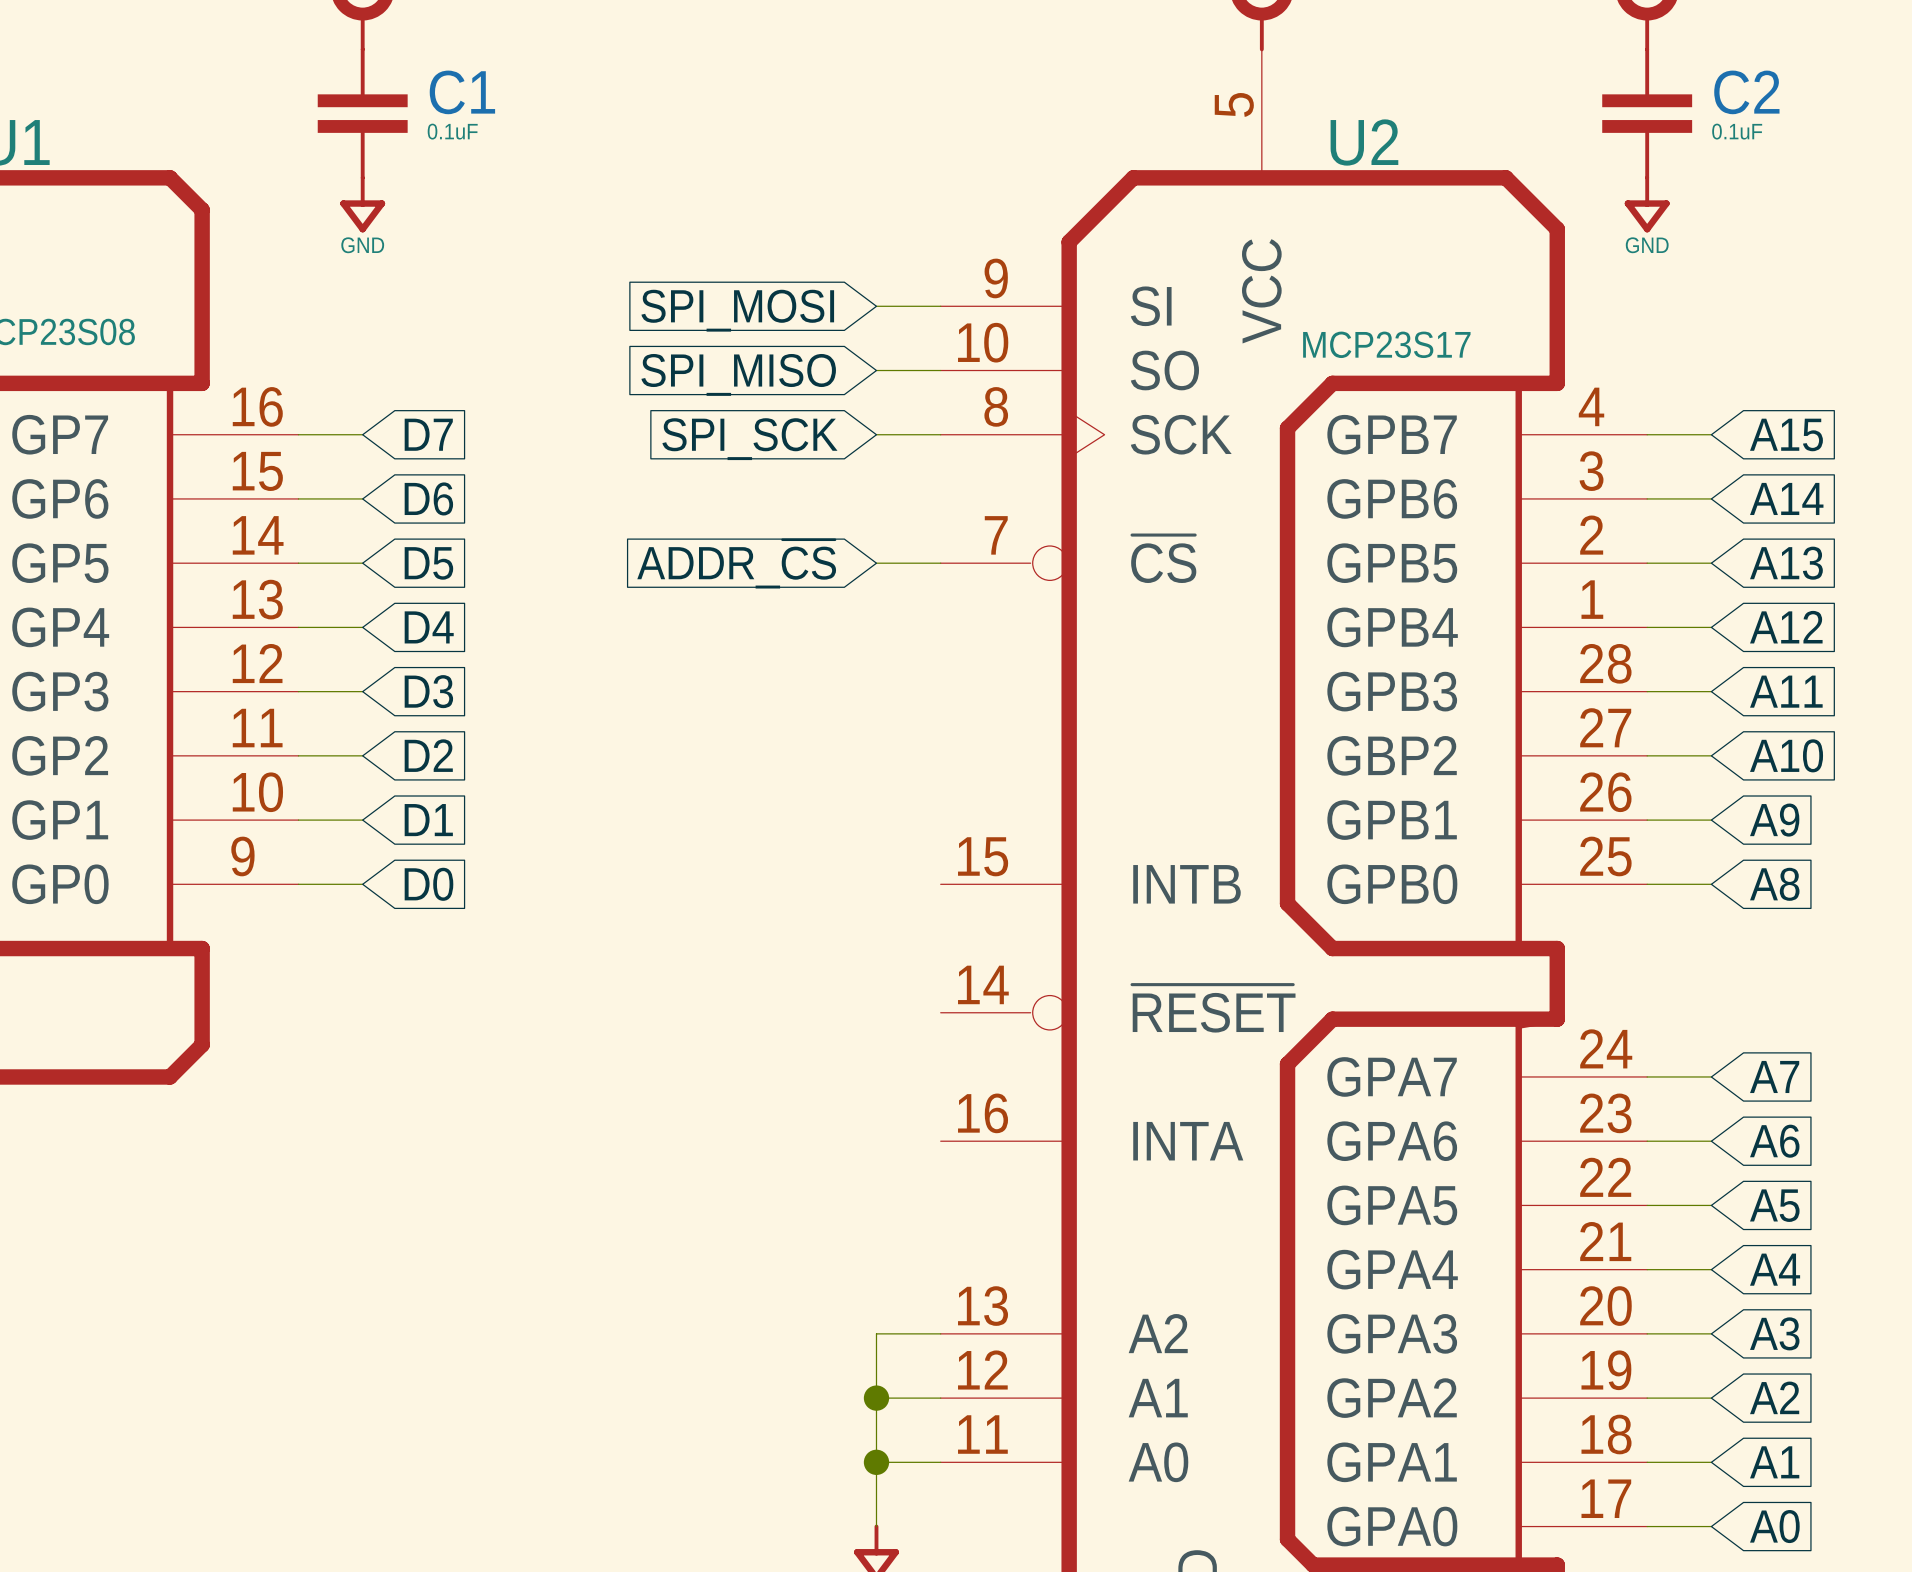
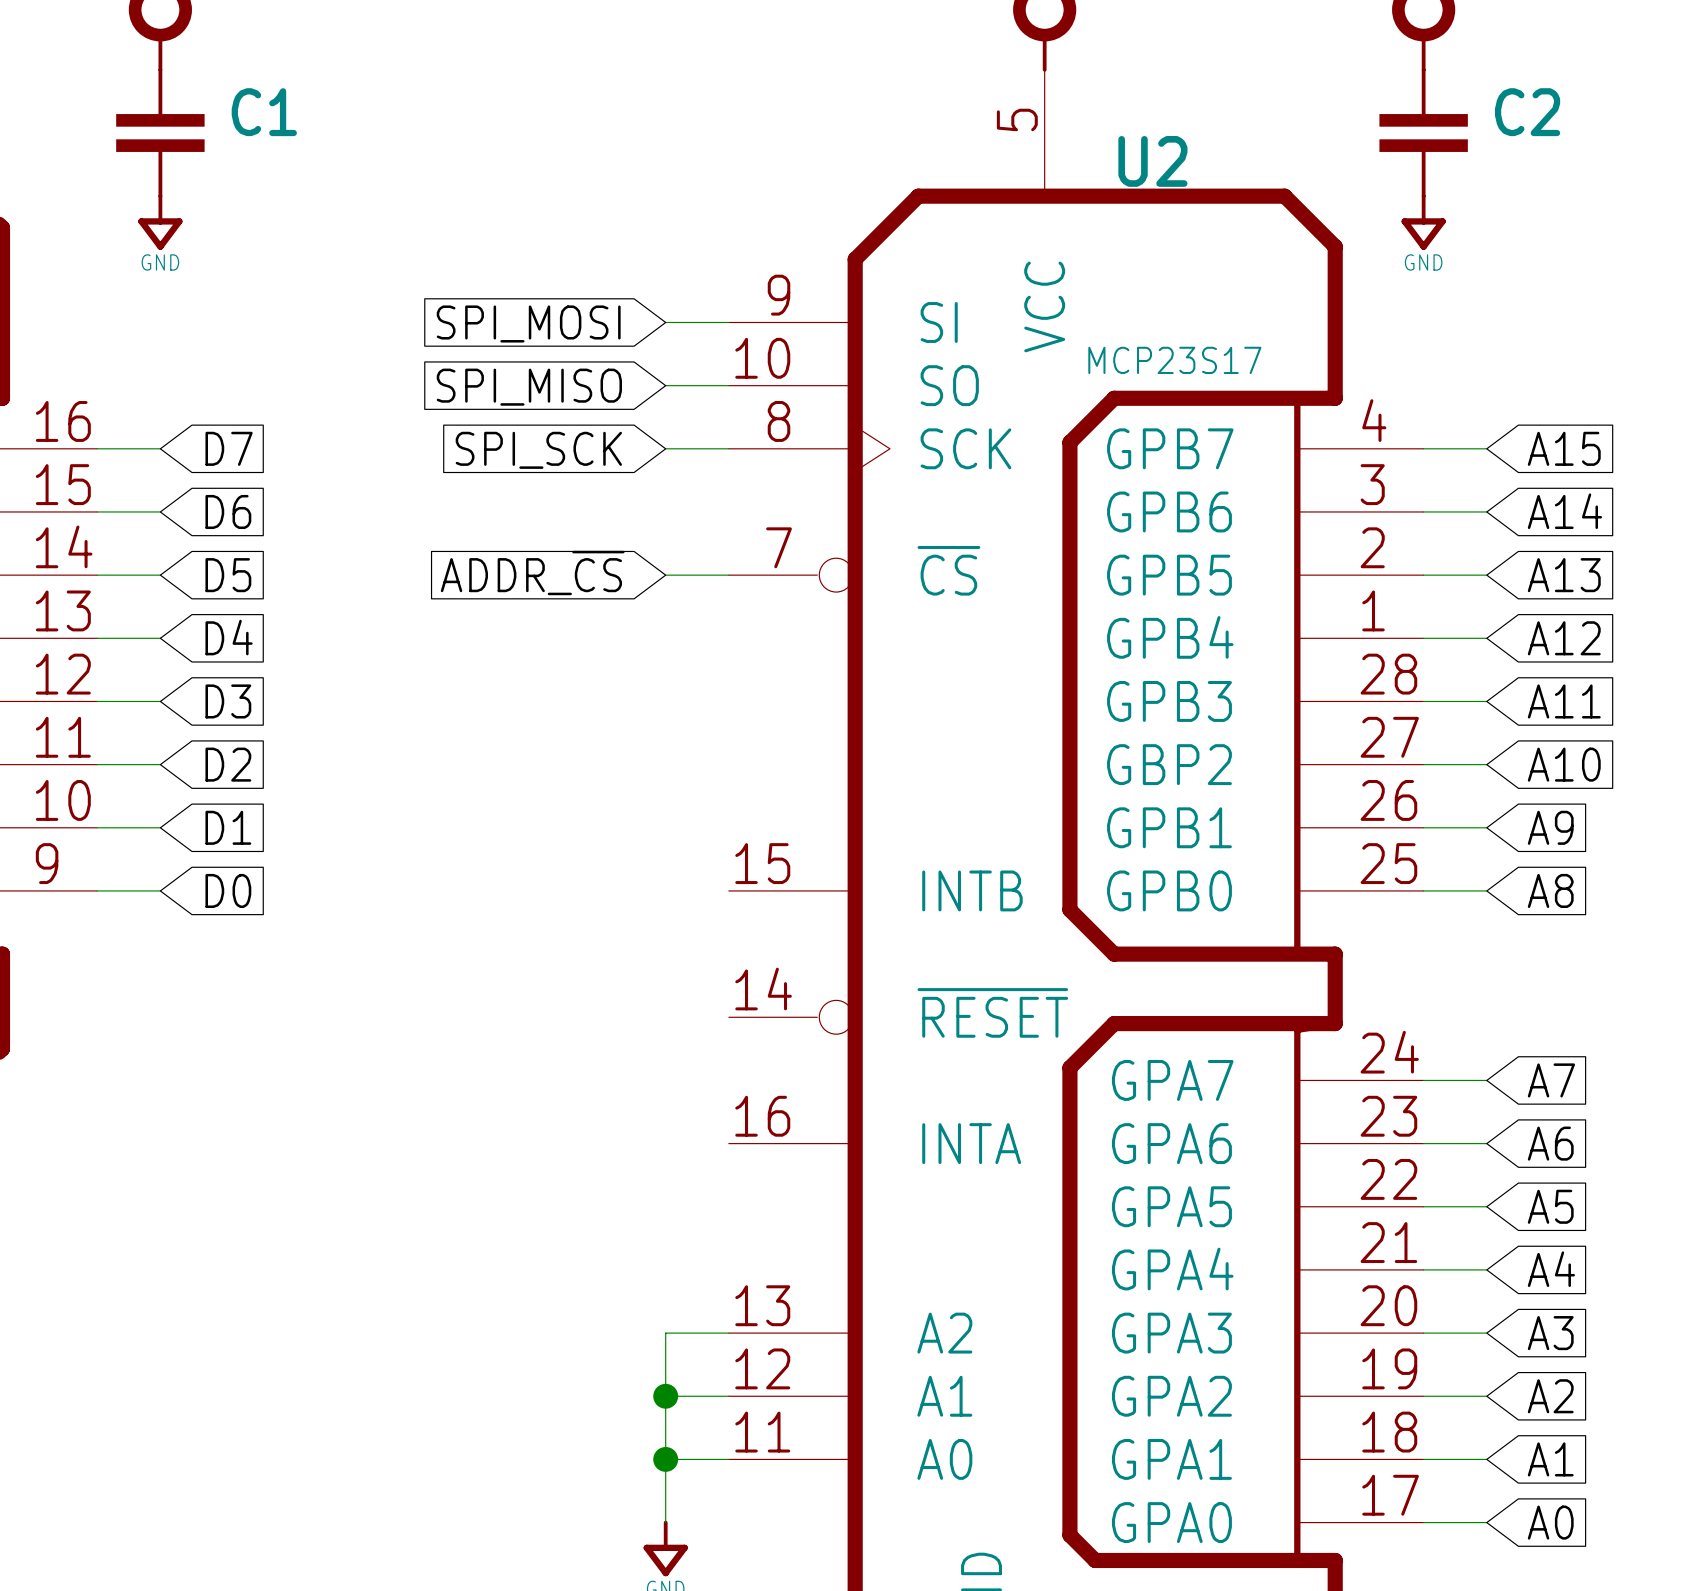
C1 value: 0.1uF (452, 131) -> none
C2 value: 0.1uF (1737, 131) -> none

